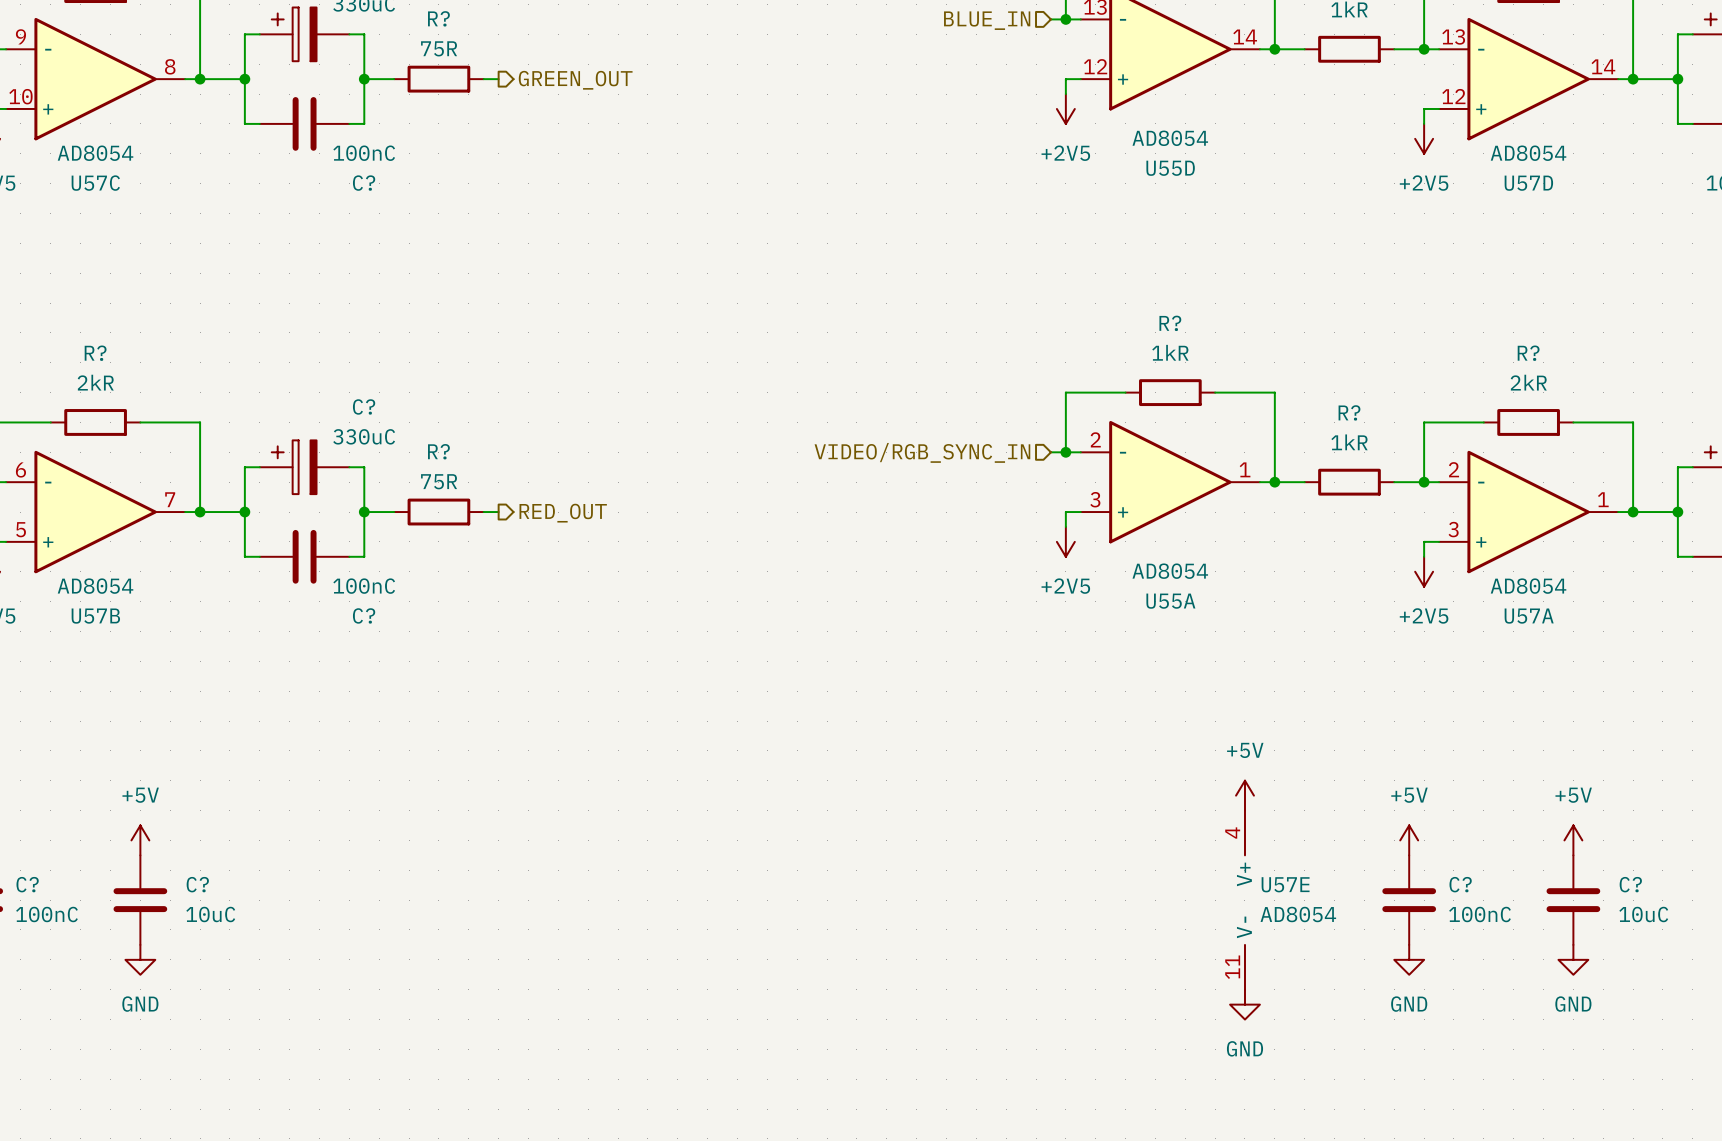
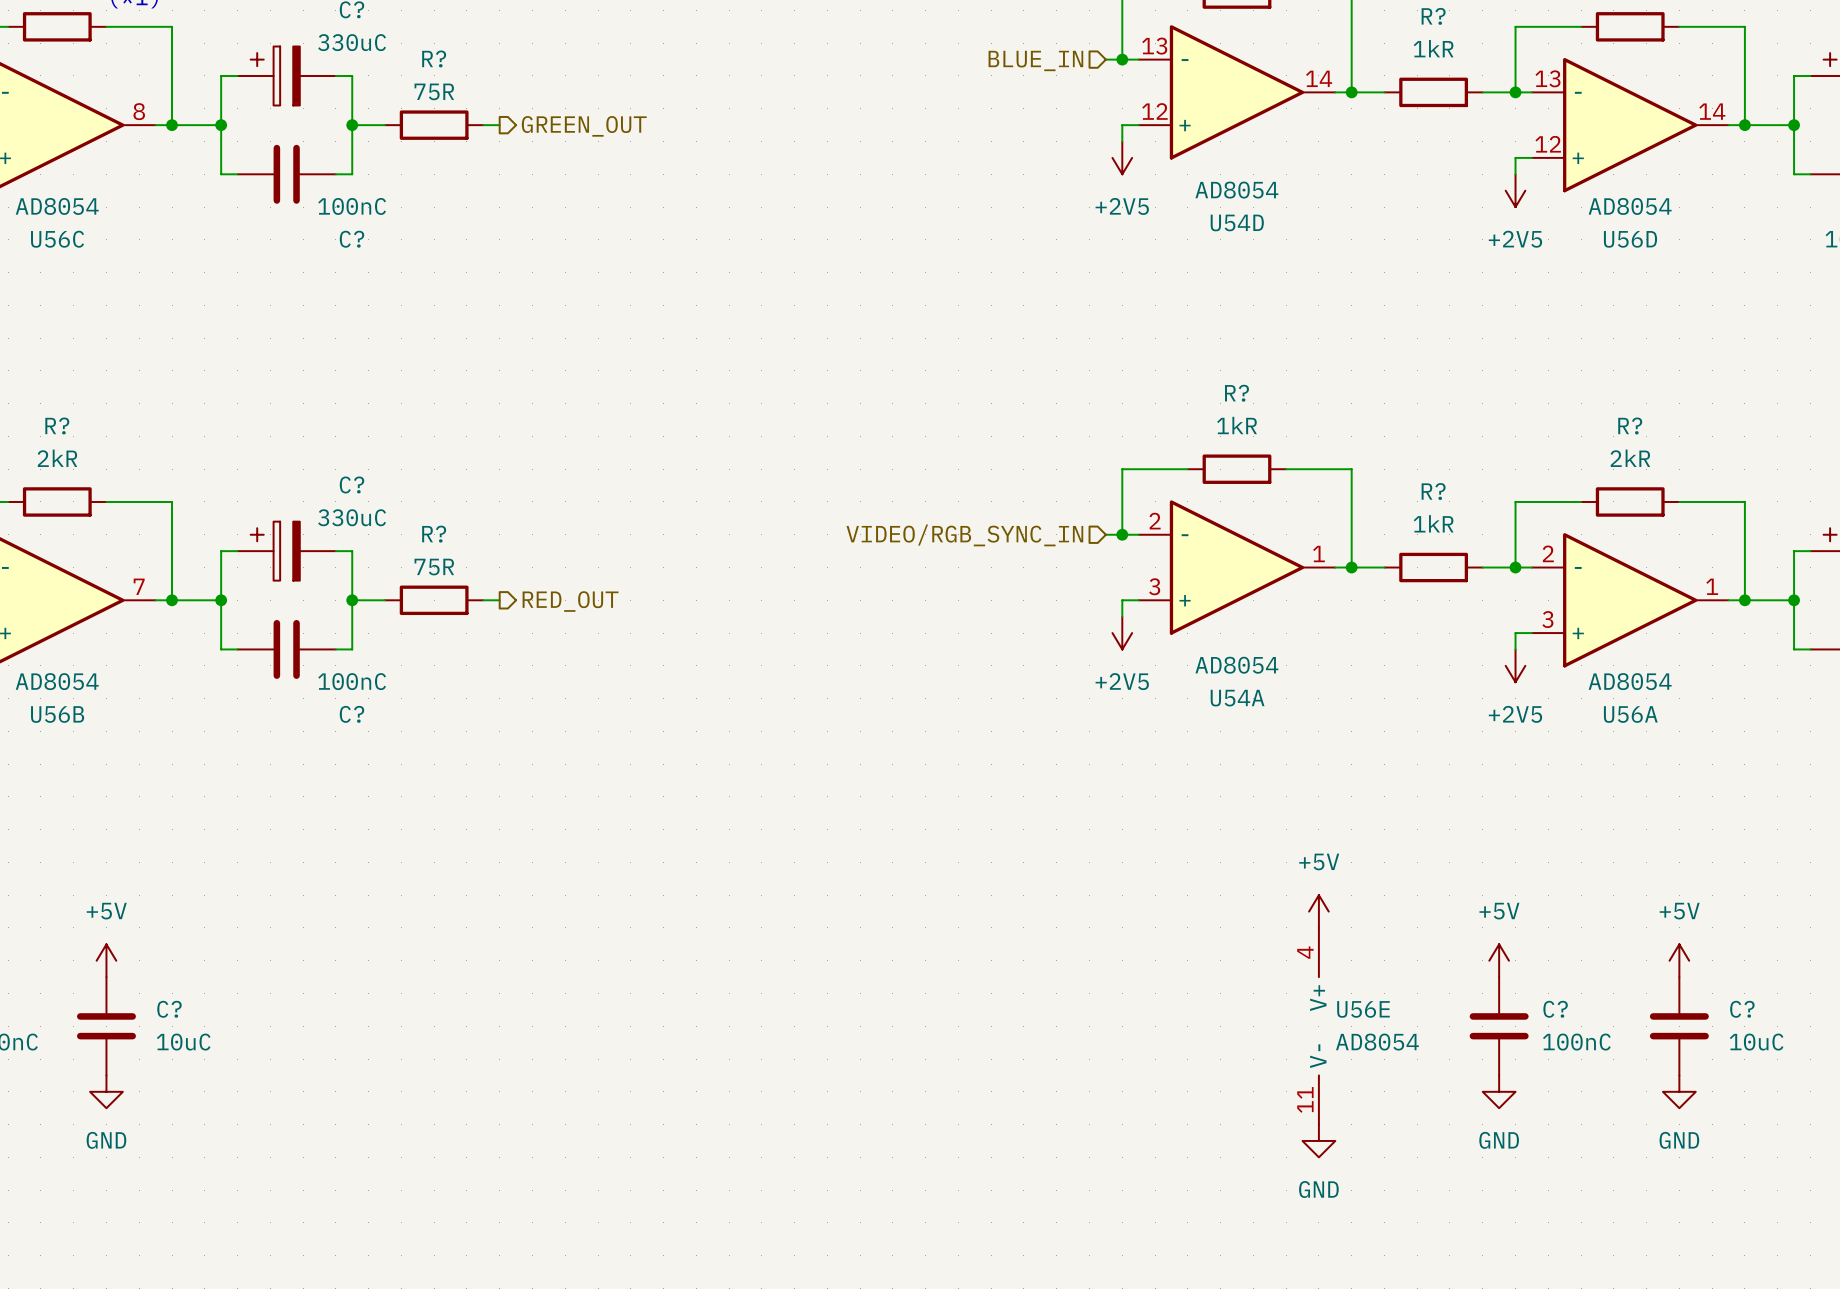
U55D name: U55D (1170, 168) -> U54D (1237, 222)
U57C name: U57C (95, 183) -> U56C (57, 239)
U57D name: U57D (1528, 183) -> U56D (1630, 239)
U55A name: U55A (1170, 601) -> U54A (1237, 698)
U57B name: U57B (95, 616) -> U56B (57, 714)
U57A name: U57A (1529, 616) -> U56A (1630, 714)
U57E name: U57E (1285, 884) -> U56E (1363, 1009)

